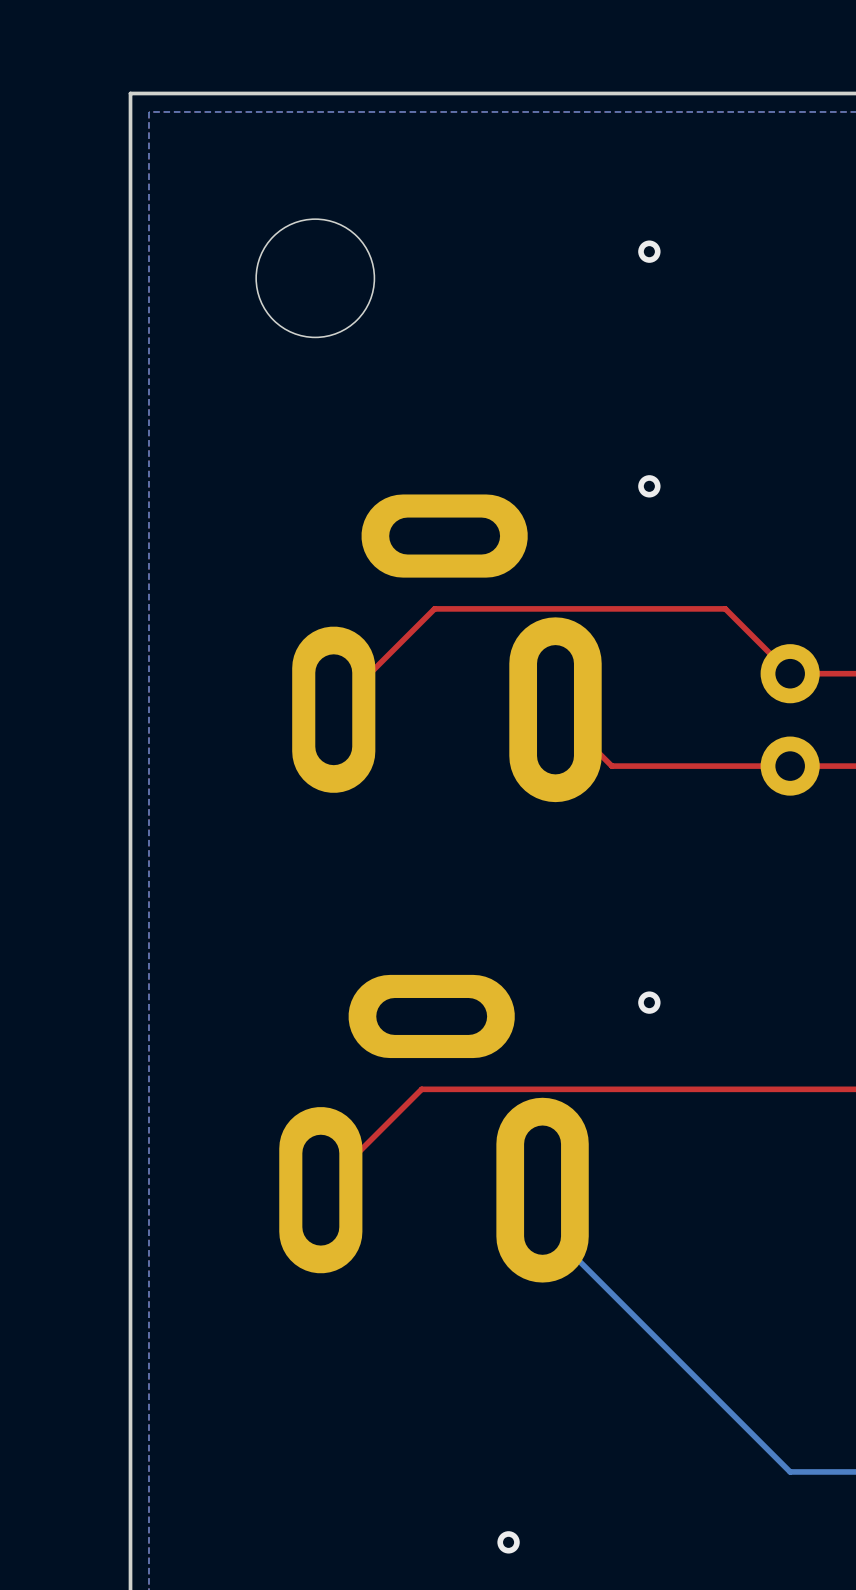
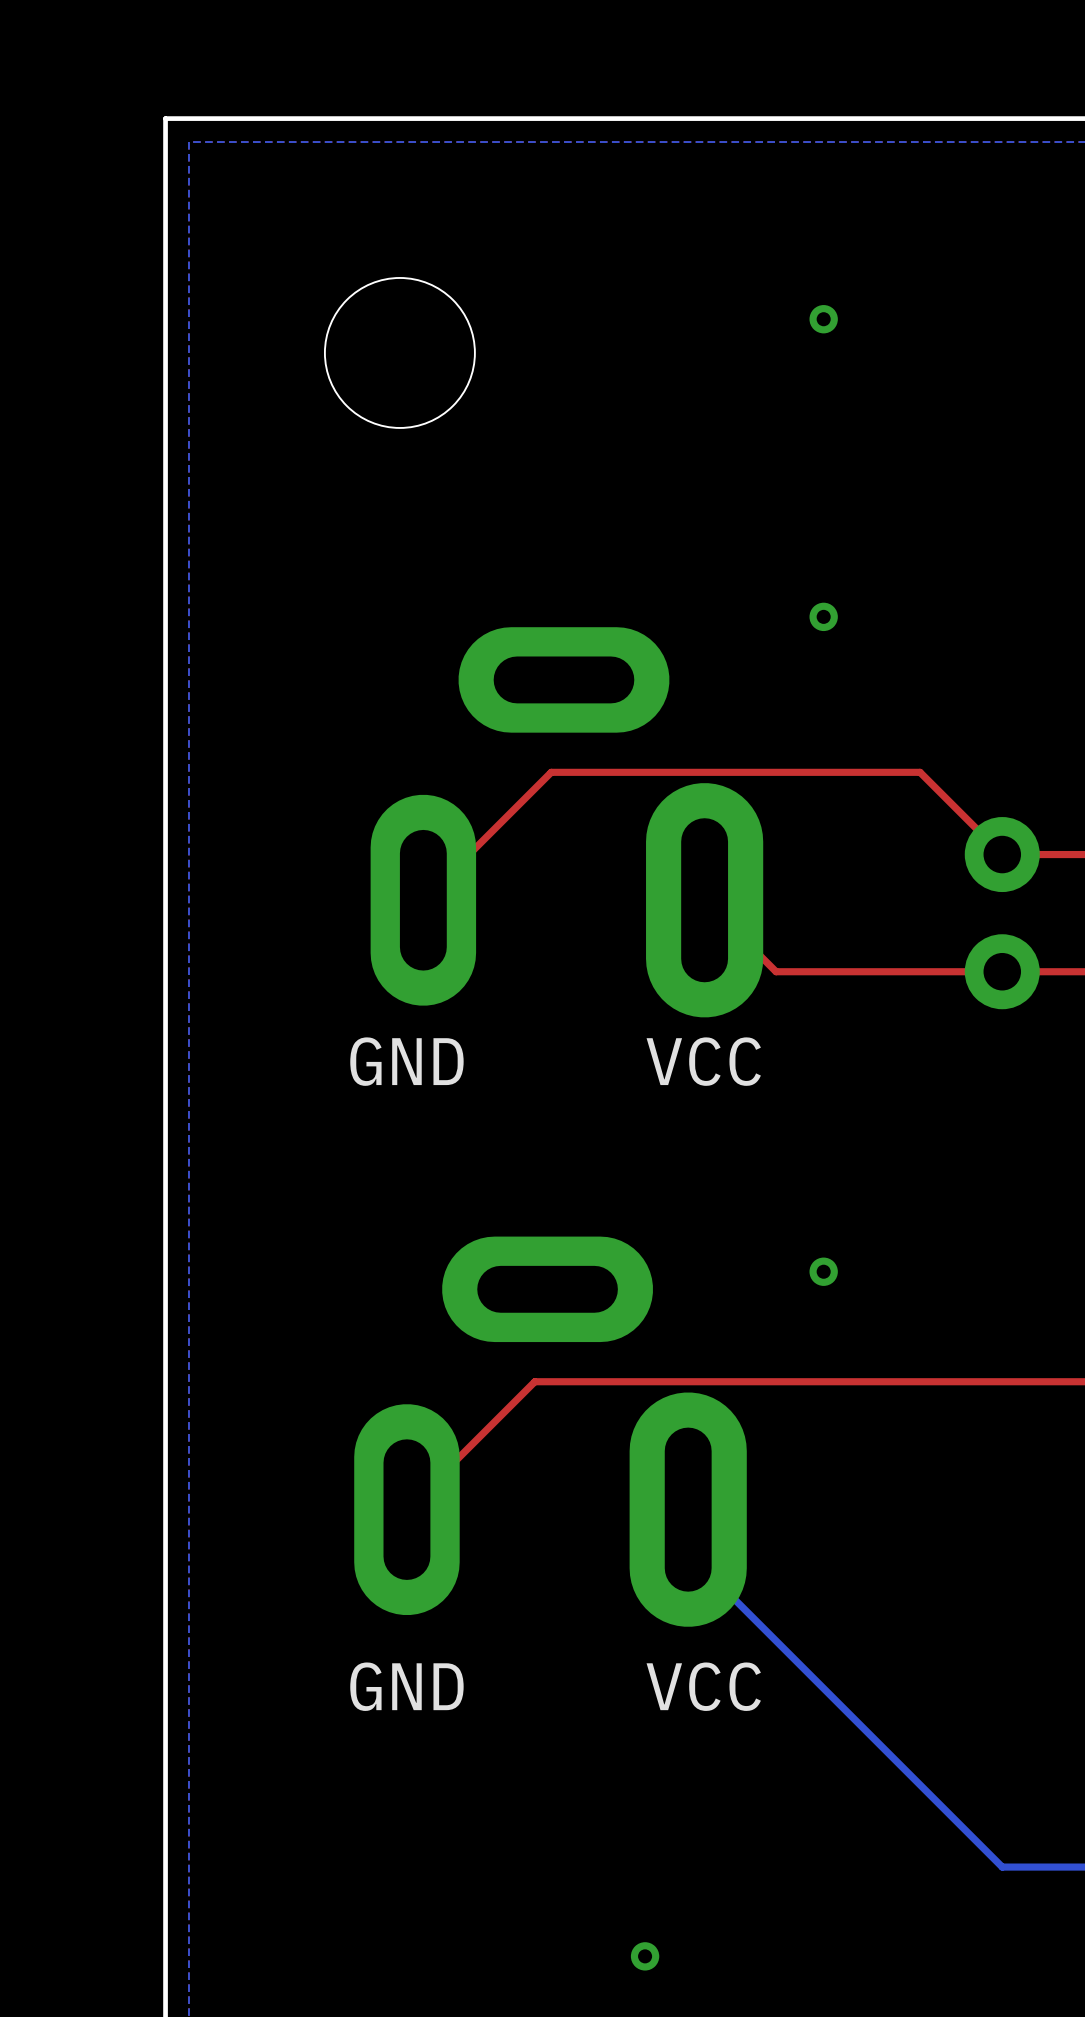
text: none -> GND (406, 1061)
text: none -> VCC (703, 1061)
text: none -> GND (406, 1686)
text: none -> VCC (703, 1686)

